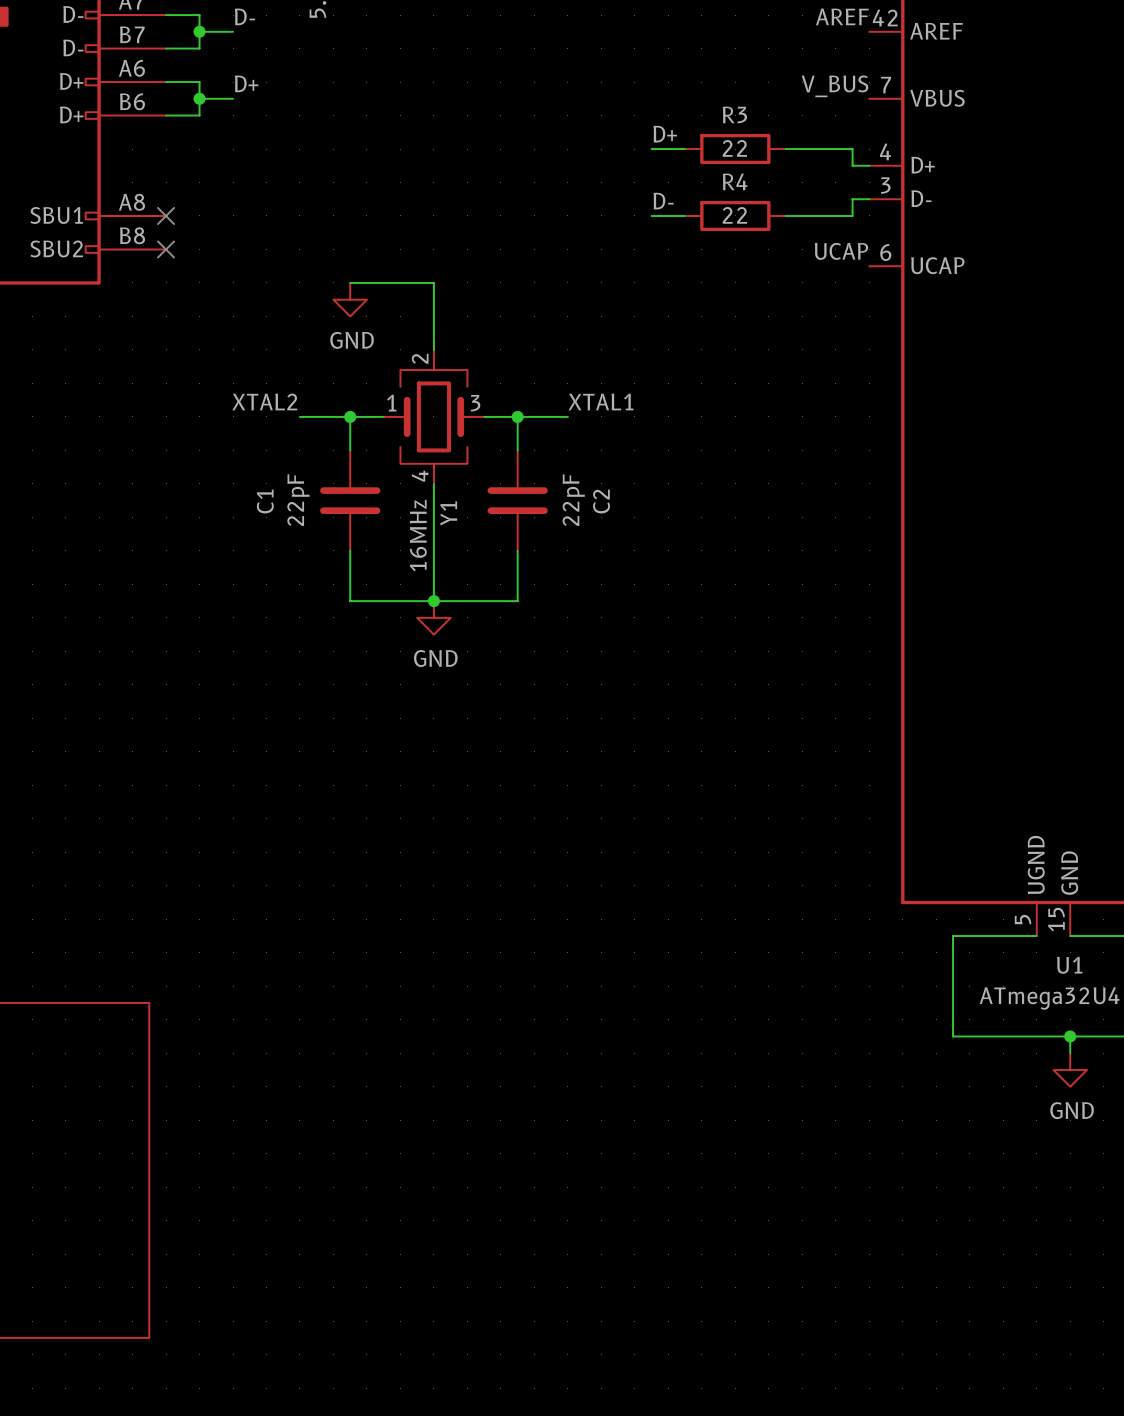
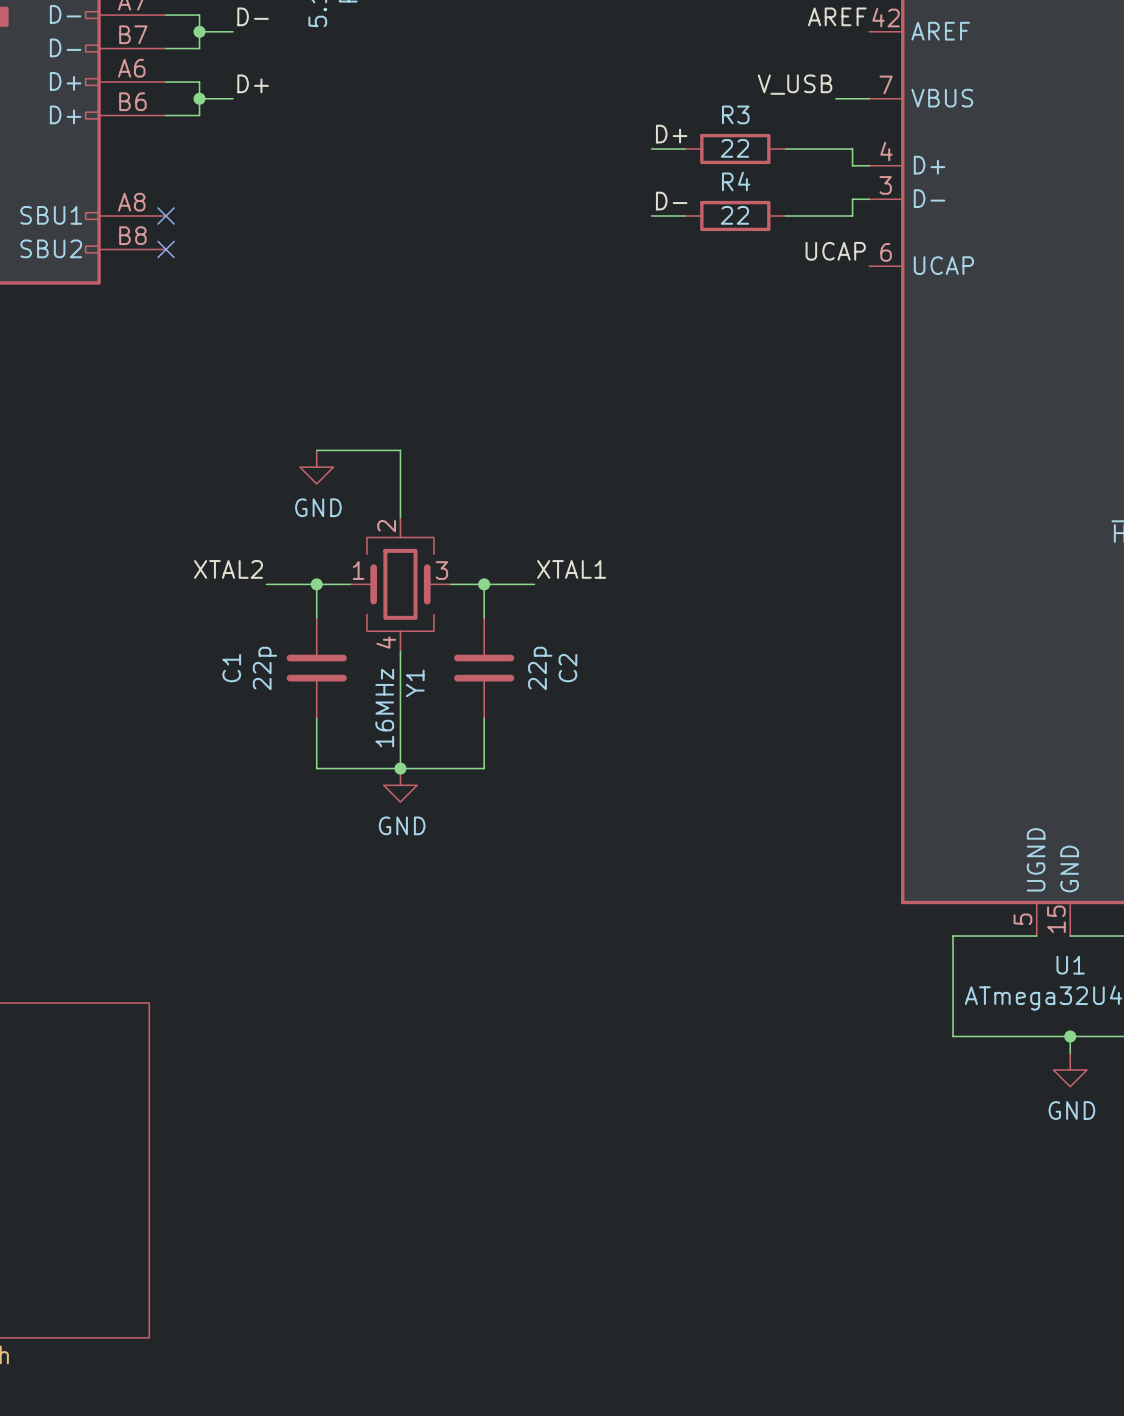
label: V_BUS (835, 86) -> V_USB (795, 84)
wire: none -> (835, 98) (869, 98)
wire: (350, 282) (433, 282) (433, 349) -> (316, 450) (400, 450) (400, 517)
power symbol: GND (350, 299) -> none
label position: XTAL2 (264, 401) -> XTAL2 (228, 569)
label position: XTAL1 (600, 401) -> XTAL1 (571, 569)
wire: (299, 416) (383, 416) -> (266, 584) (350, 584)
wire: (350, 416) (350, 450) -> (316, 584) (316, 617)
junction: (350, 416) -> none
Y1 position: (433, 416) -> (400, 584)
wire: (484, 416) (567, 416) -> (450, 584) (534, 584)
wire: (517, 416) (517, 450) -> (484, 584) (484, 617)
junction: (517, 416) -> none
power symbol: none -> GND (316, 467)
wire: (433, 483) (433, 601) -> (400, 651) (400, 768)
C1 value: 22pF (298, 500) -> 22p (264, 668)
C1 position: (350, 500) -> (316, 668)
C2 position: (517, 500) -> (484, 668)
C2 value: 22pF (573, 500) -> 22p (540, 668)
wire: (350, 550) (350, 601) (517, 601) (517, 550) -> (316, 718) (316, 768) (484, 768) (484, 718)
junction: none -> (316, 584)
junction position: (433, 601) -> (484, 584)
power symbol: GND (433, 617) -> none
junction: none -> (400, 768)
power symbol: none -> GND (400, 785)

